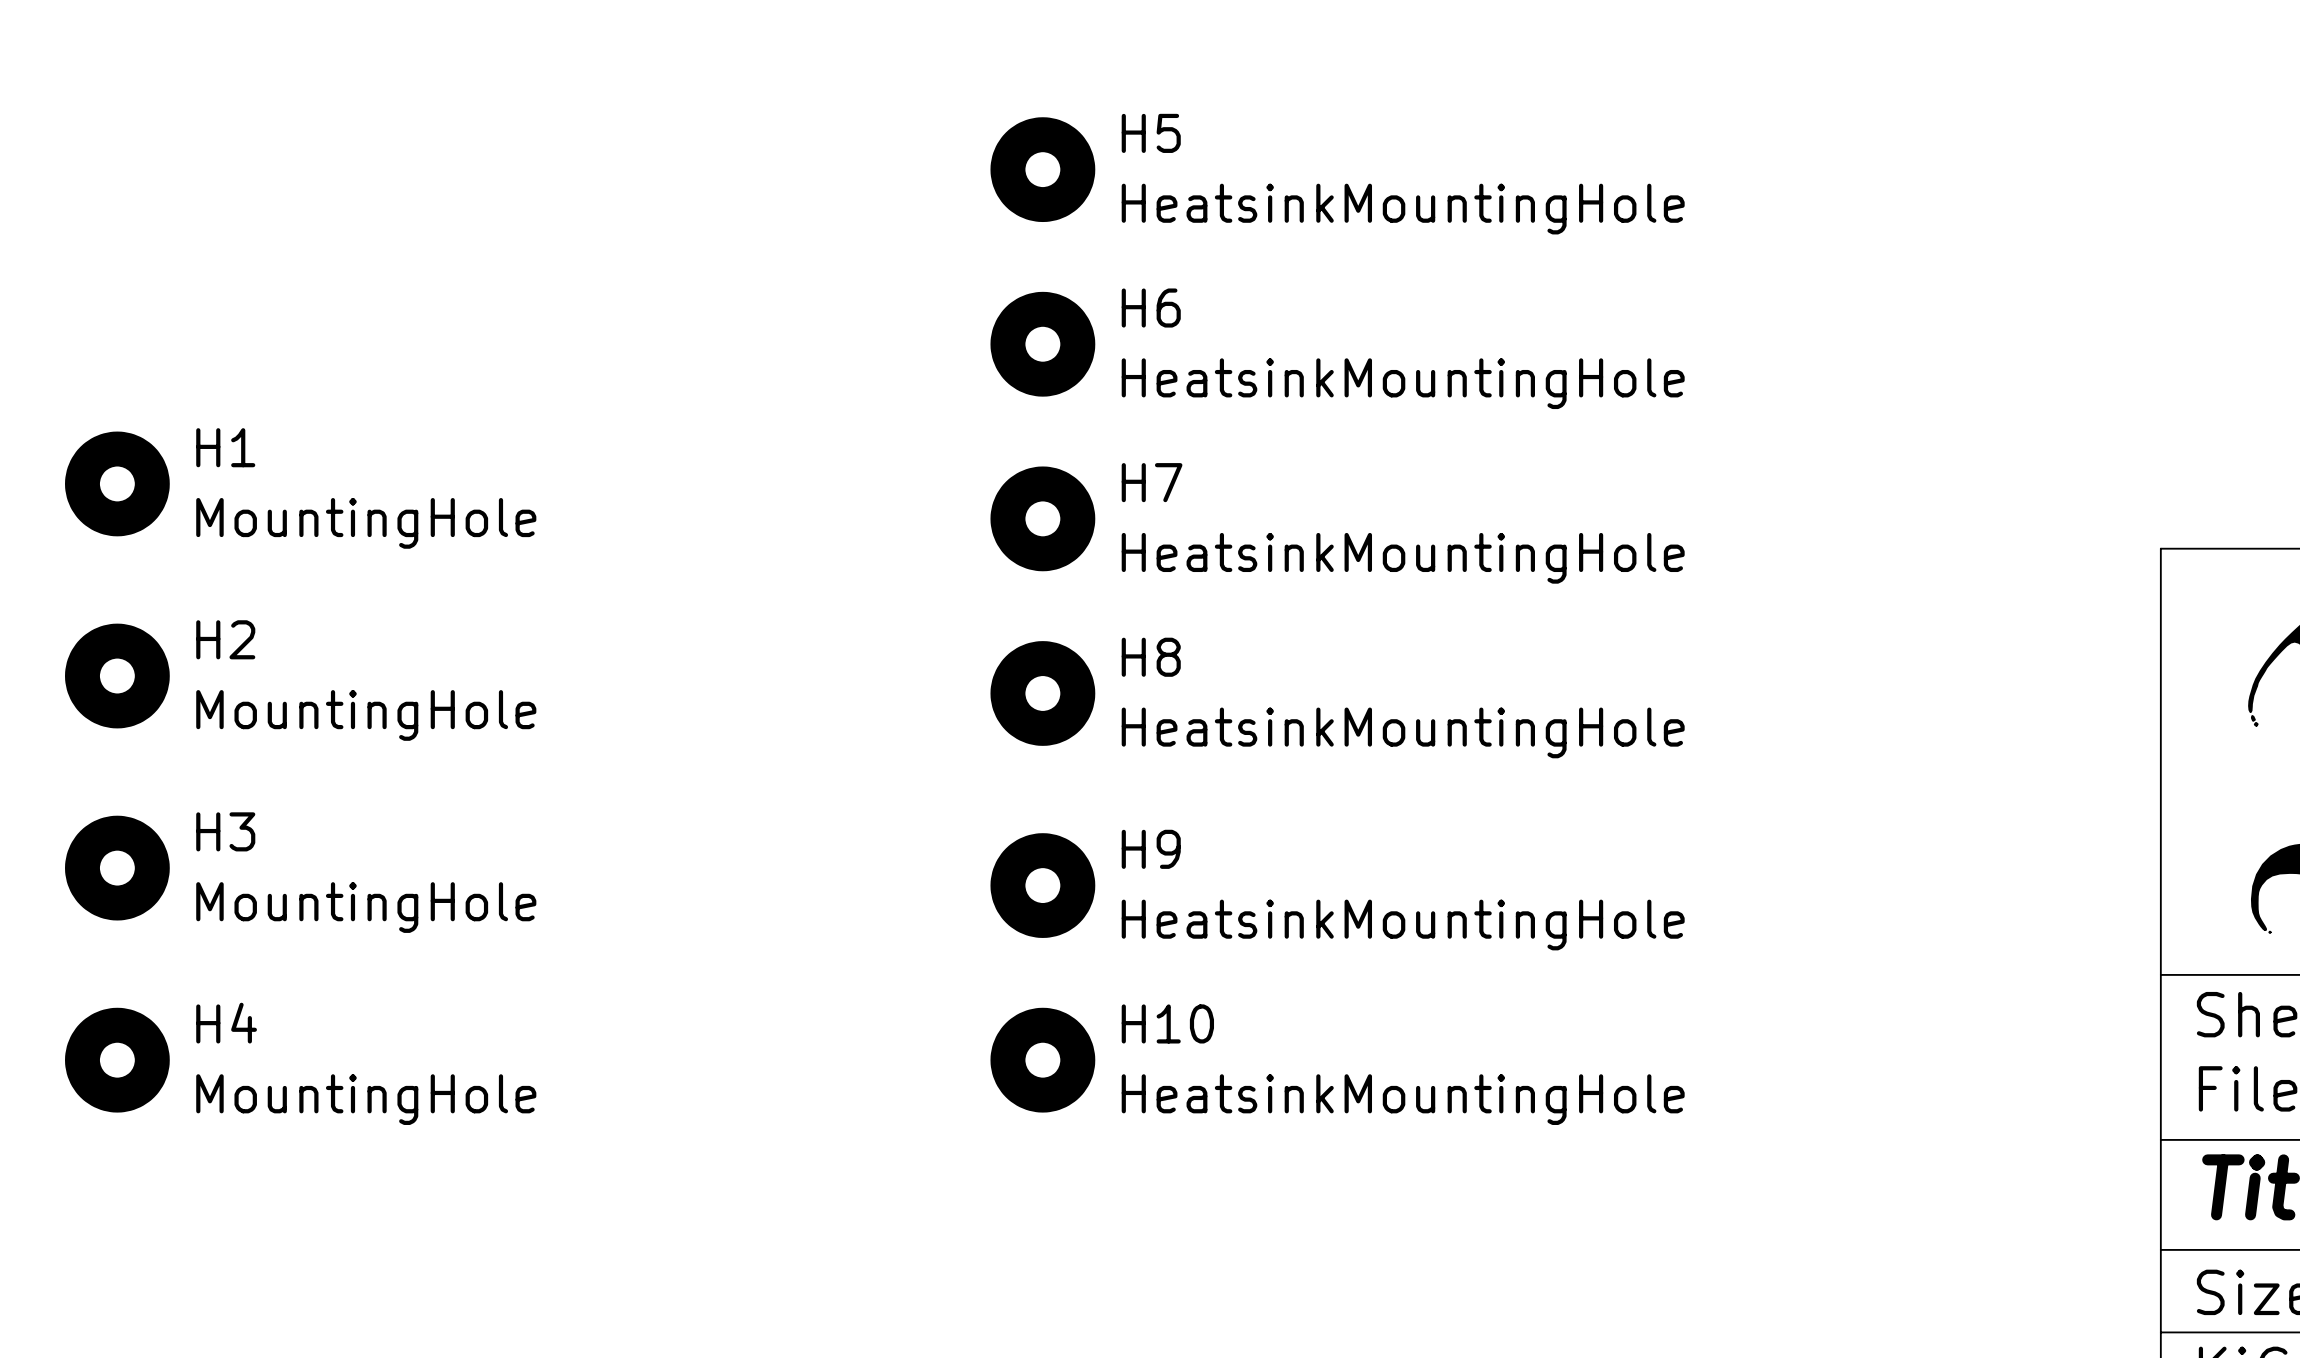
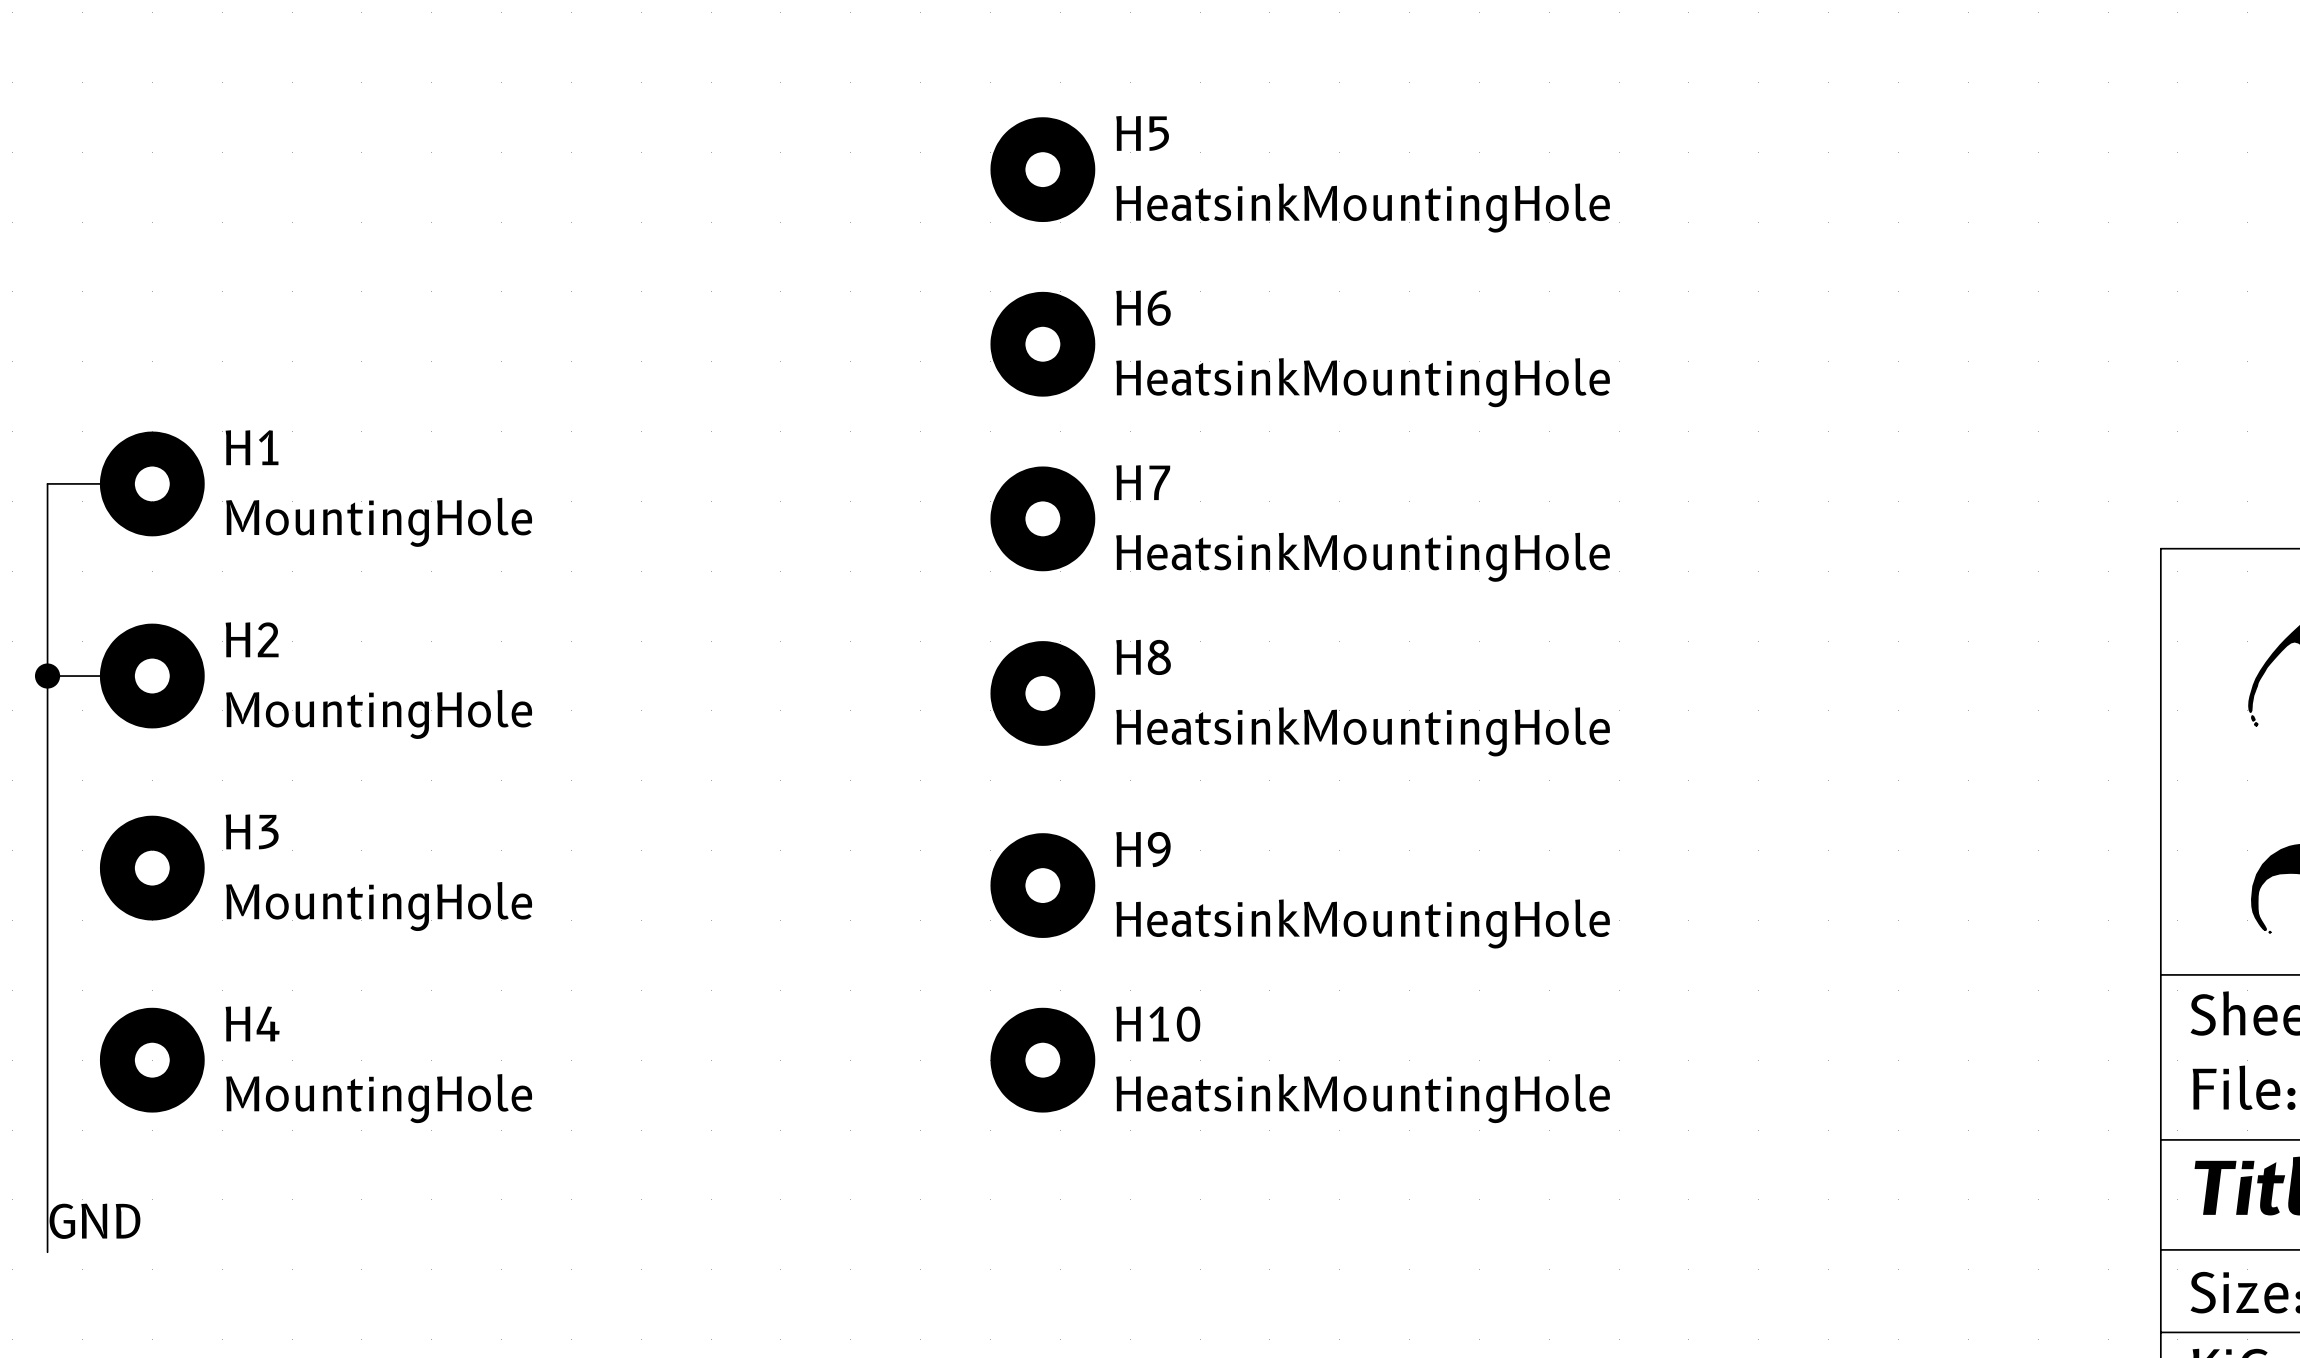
H1 symbol: [65, 431, 170, 537] -> [47, 431, 205, 537]
wire: none -> (47, 483) (47, 1252)
H2 symbol: [65, 623, 170, 729] -> [47, 623, 205, 729]
junction: none -> (47, 676)
H3 position: (117, 868) -> (152, 868)
H4 position: (117, 1060) -> (152, 1060)
label: none -> GND (94, 1221)

